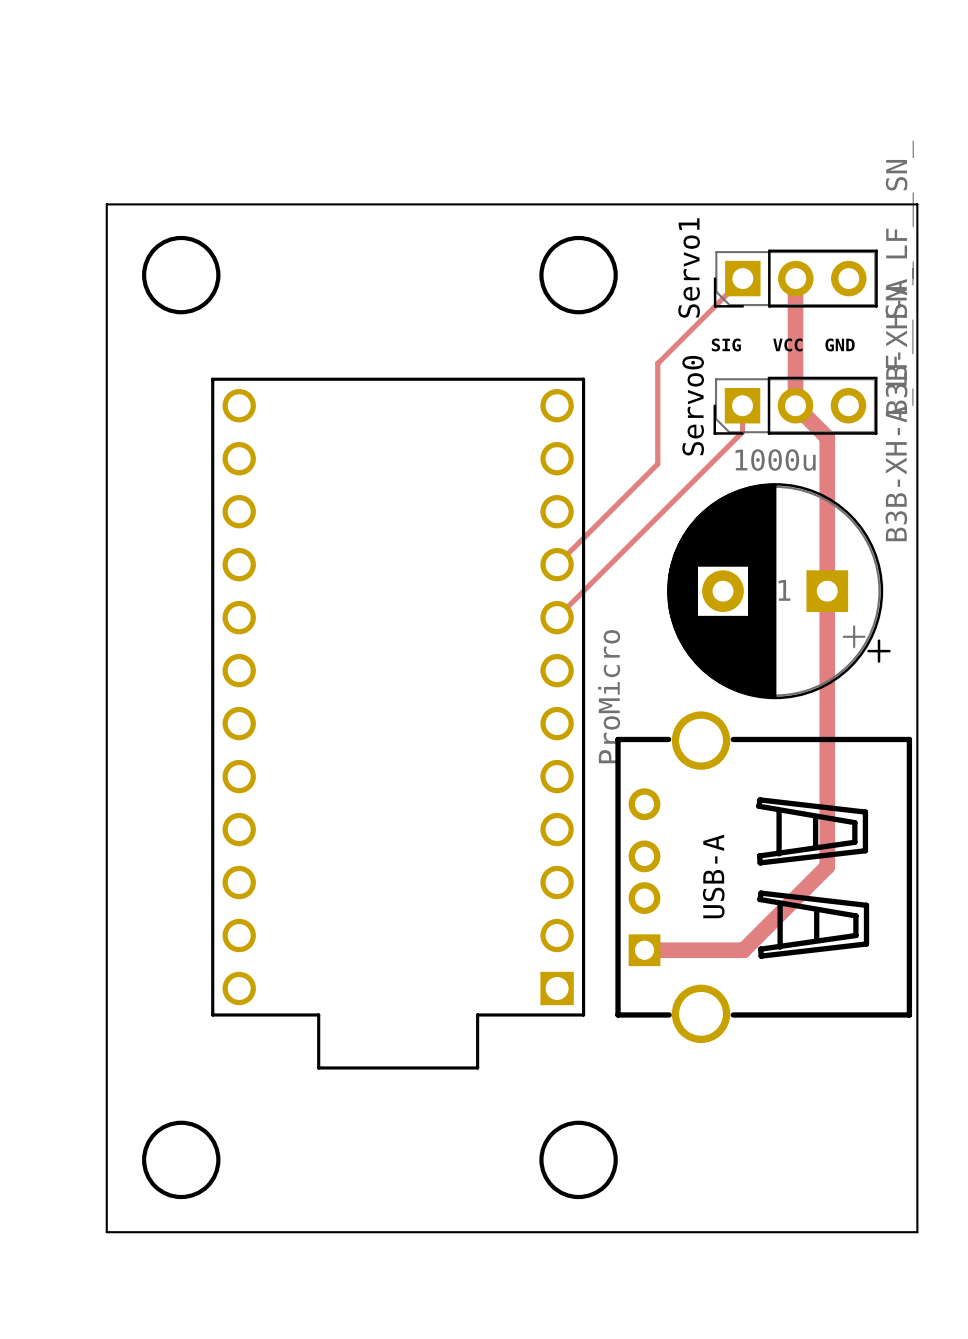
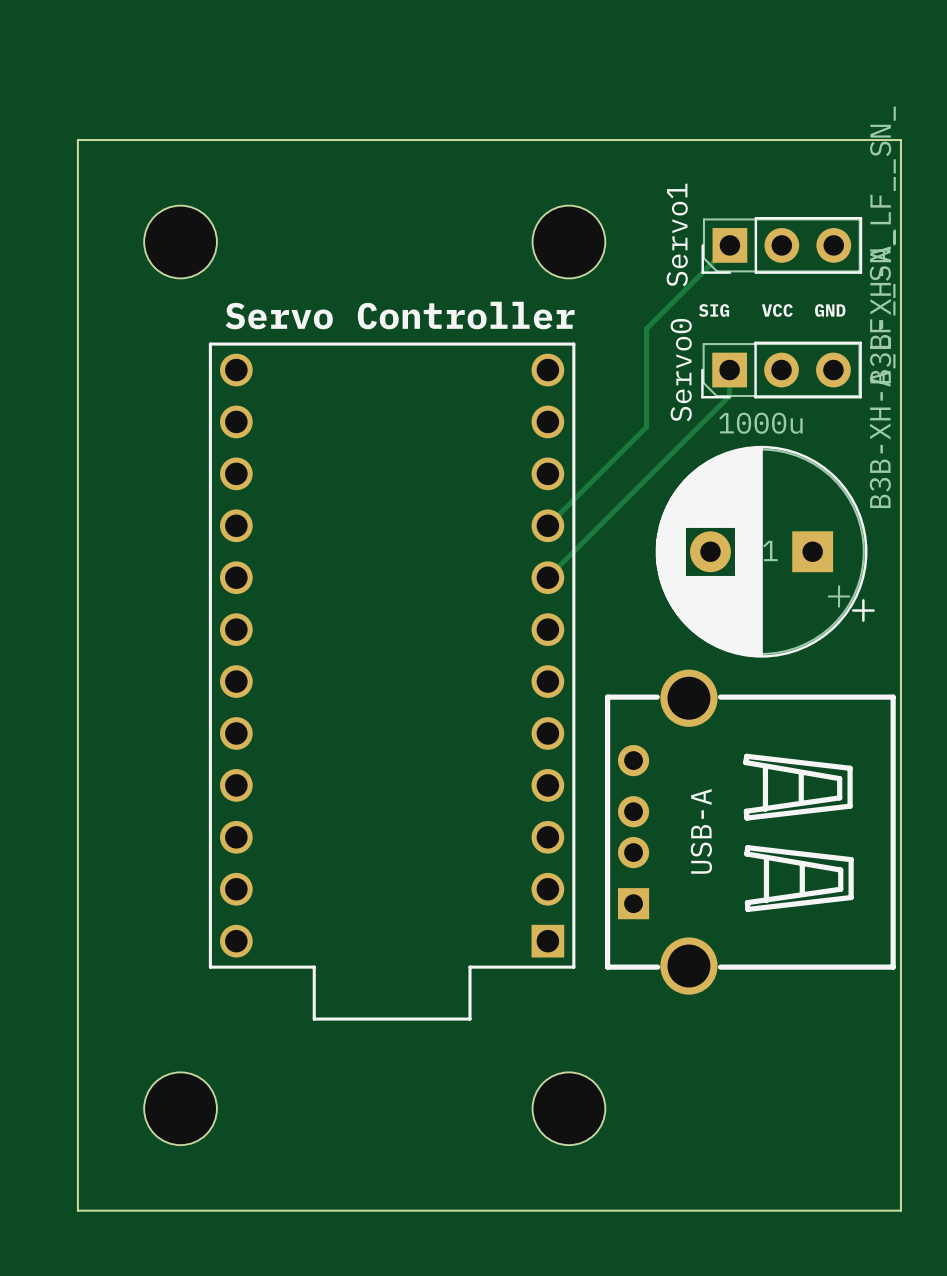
board edge: (917, 204) (106, 204) (106, 1232) (917, 1232) -> (900, 172) (900, 140) (77, 140) (77, 1210) (900, 1210) (900, 1180)
round board edge: [142, 235, 221, 315] -> none
round board edge: [539, 235, 618, 315] -> none
part: none -> (180, 242)
part: none -> (568, 242)
track: (795, 278) (795, 405) (827, 437) (827, 866) (743, 950) (644, 950) -> none
text: none -> Servo Controller (400, 315)
part value: ProMicro (609, 696) -> none
round board edge: [142, 1120, 221, 1200] -> none
round board edge: [539, 1120, 618, 1200] -> none
part: none -> (180, 1108)
part: none -> (568, 1108)

